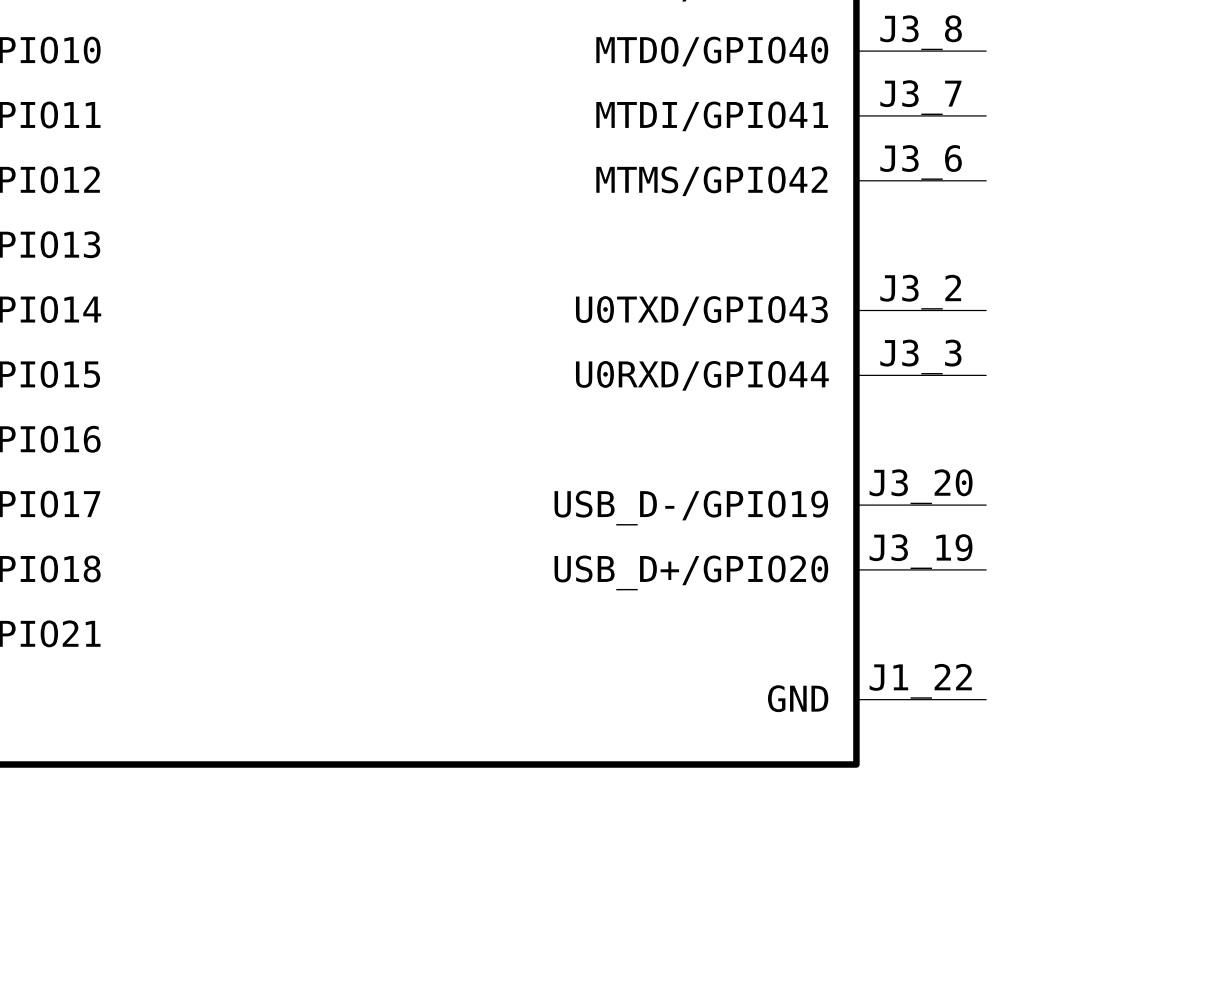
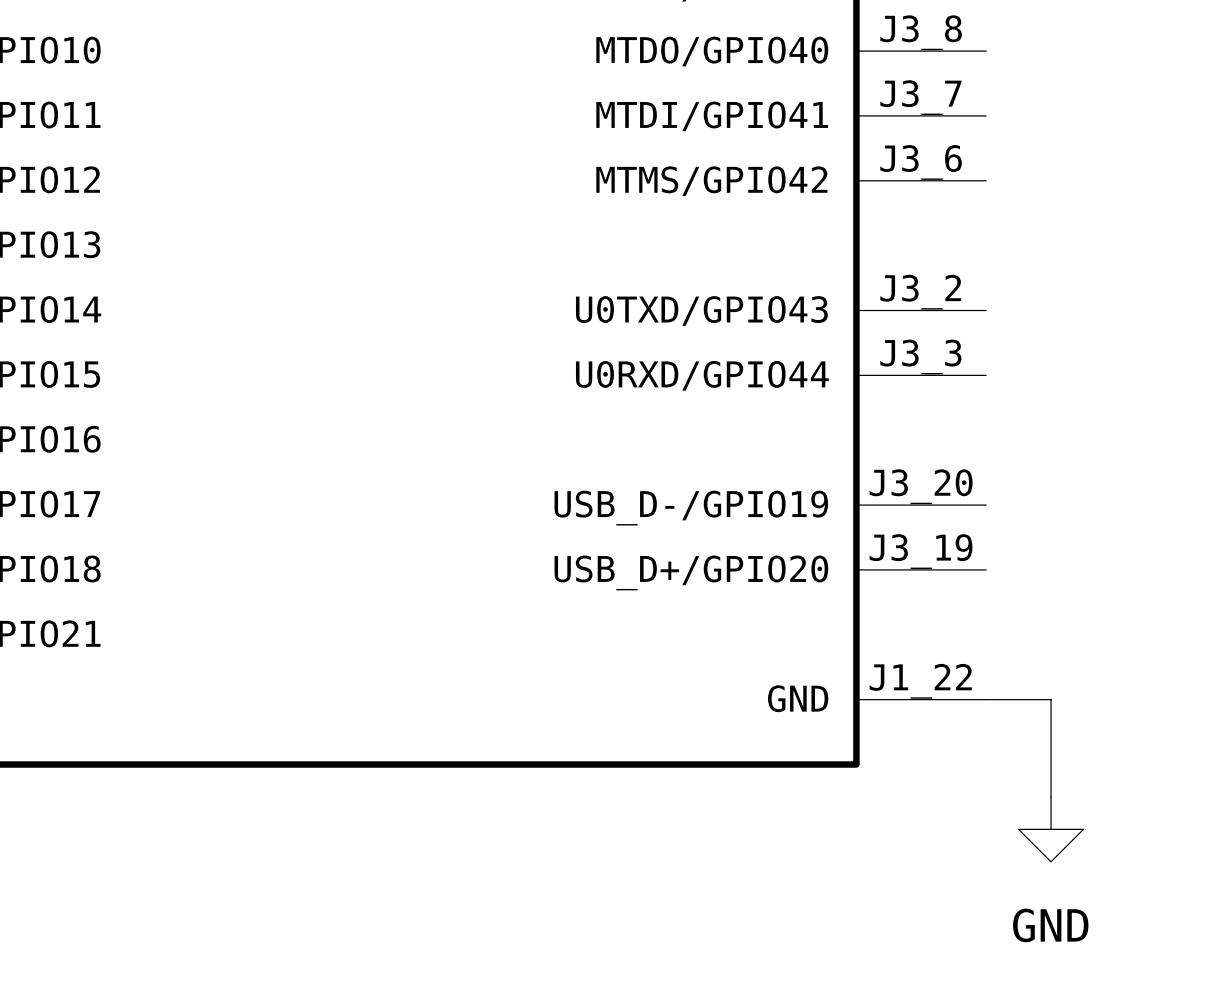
wire: none -> (986, 699) (1051, 699) (1051, 796)
power symbol: none -> GND (1051, 829)

